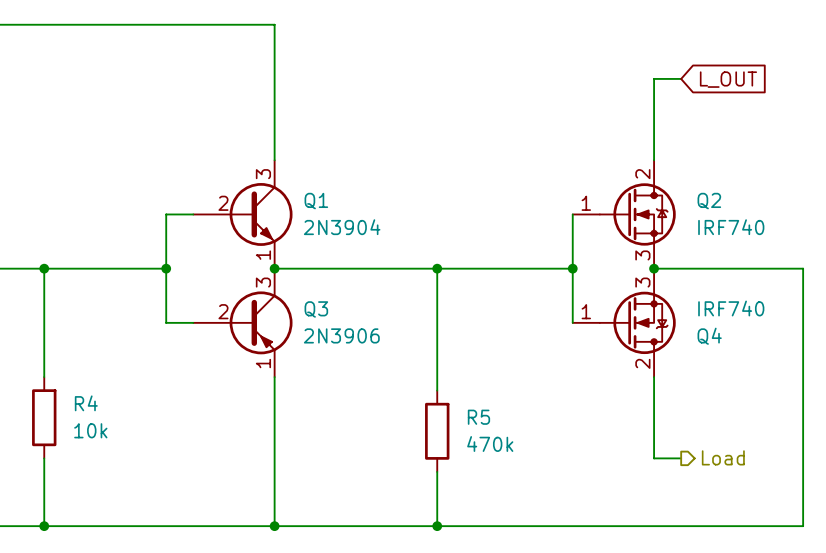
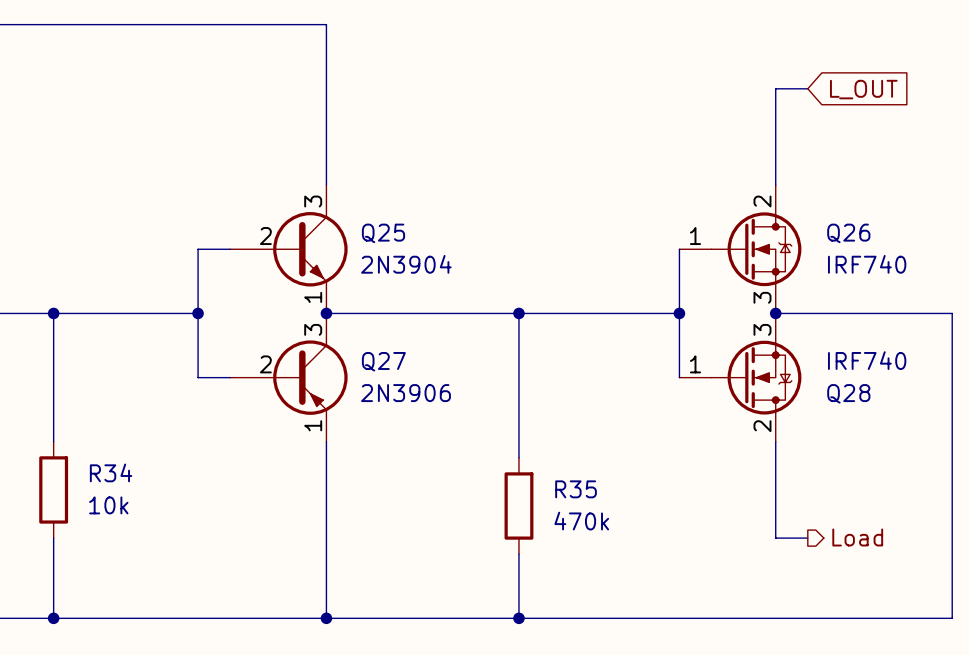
Q1 name: Q1 (316, 201) -> Q25 (383, 233)
Q2 name: Q2 (709, 201) -> Q26 (848, 233)
Q3 name: Q3 (316, 309) -> Q27 (383, 361)
Q4 name: Q4 (709, 336) -> Q28 (848, 393)
R4 name: R4 (86, 403) -> R34 (111, 472)
R5 name: R5 (478, 417) -> R35 (576, 489)

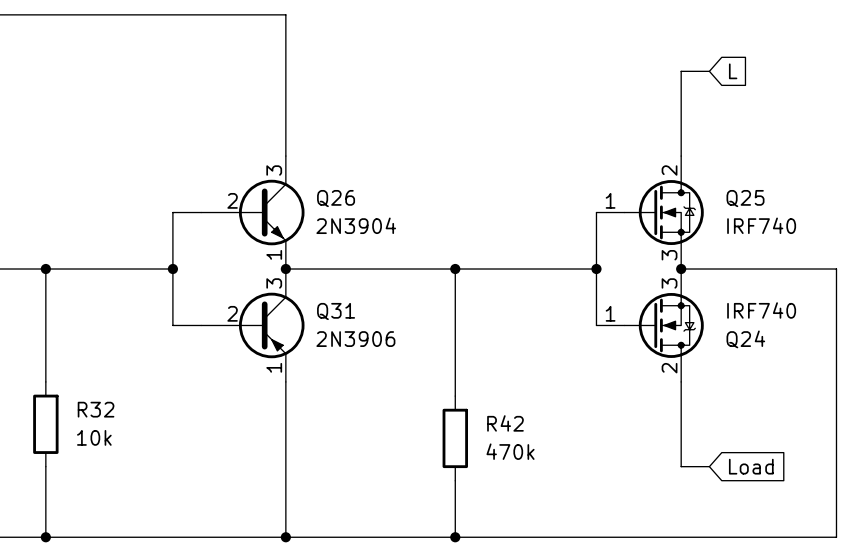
global label: L_OUT (863, 89) -> L (733, 71)
Q25 name: Q25 (383, 233) -> Q26 (336, 198)
Q26 name: Q26 (848, 233) -> Q25 (745, 198)
Q27 name: Q27 (383, 361) -> Q31 (336, 311)
Q28 name: Q28 (848, 393) -> Q24 (745, 339)
R34 name: R34 (111, 472) -> R32 (96, 409)
R35 name: R35 (576, 489) -> R42 (505, 423)
hierarchical label: Load (857, 537) -> none
global label: none -> Load (751, 466)

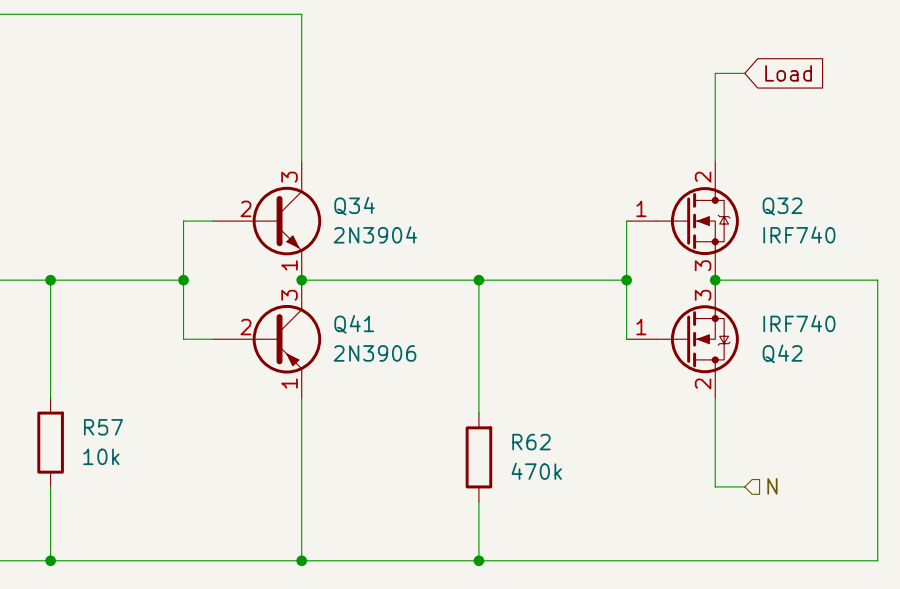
global label: L (733, 71) -> Load (788, 73)
Q26 name: Q26 (336, 198) -> Q34 (354, 206)
Q25 name: Q25 (745, 198) -> Q32 (782, 206)
Q31 name: Q31 (336, 311) -> Q41 (354, 324)
Q24 name: Q24 (745, 339) -> Q42 (782, 353)
R32 name: R32 (96, 409) -> R57 (103, 427)
R42 name: R42 (505, 423) -> R62 (531, 442)
hierarchical label: none -> N (772, 486)
global label: Load (751, 466) -> none

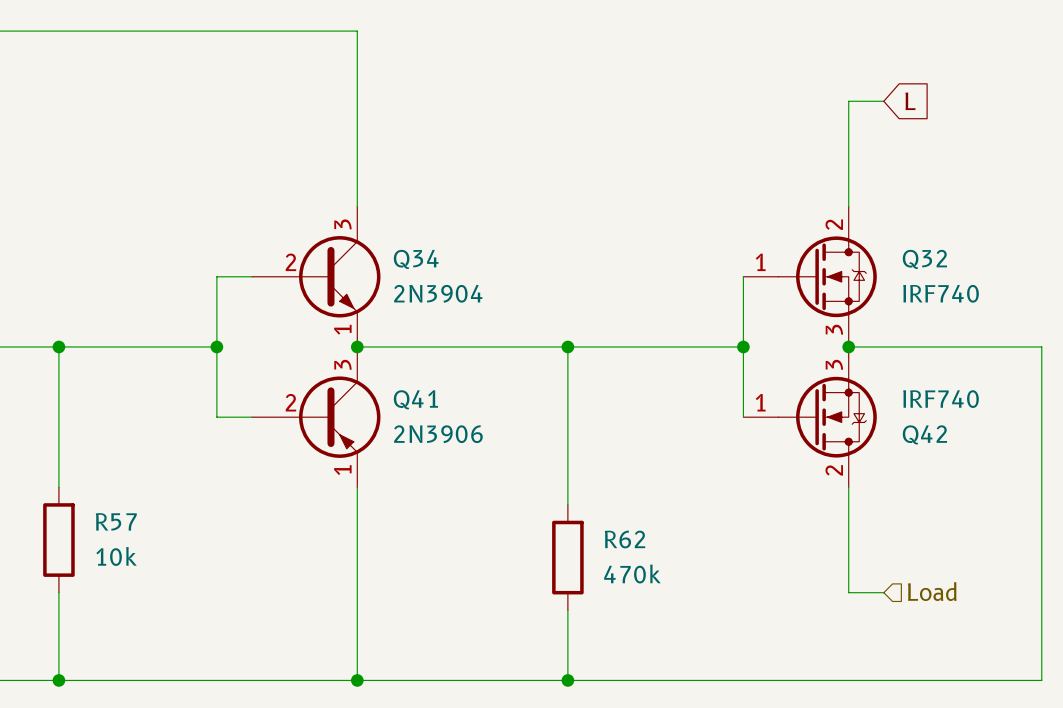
global label: Load (788, 73) -> L (910, 101)
hierarchical label: N (772, 486) -> Load (932, 591)

